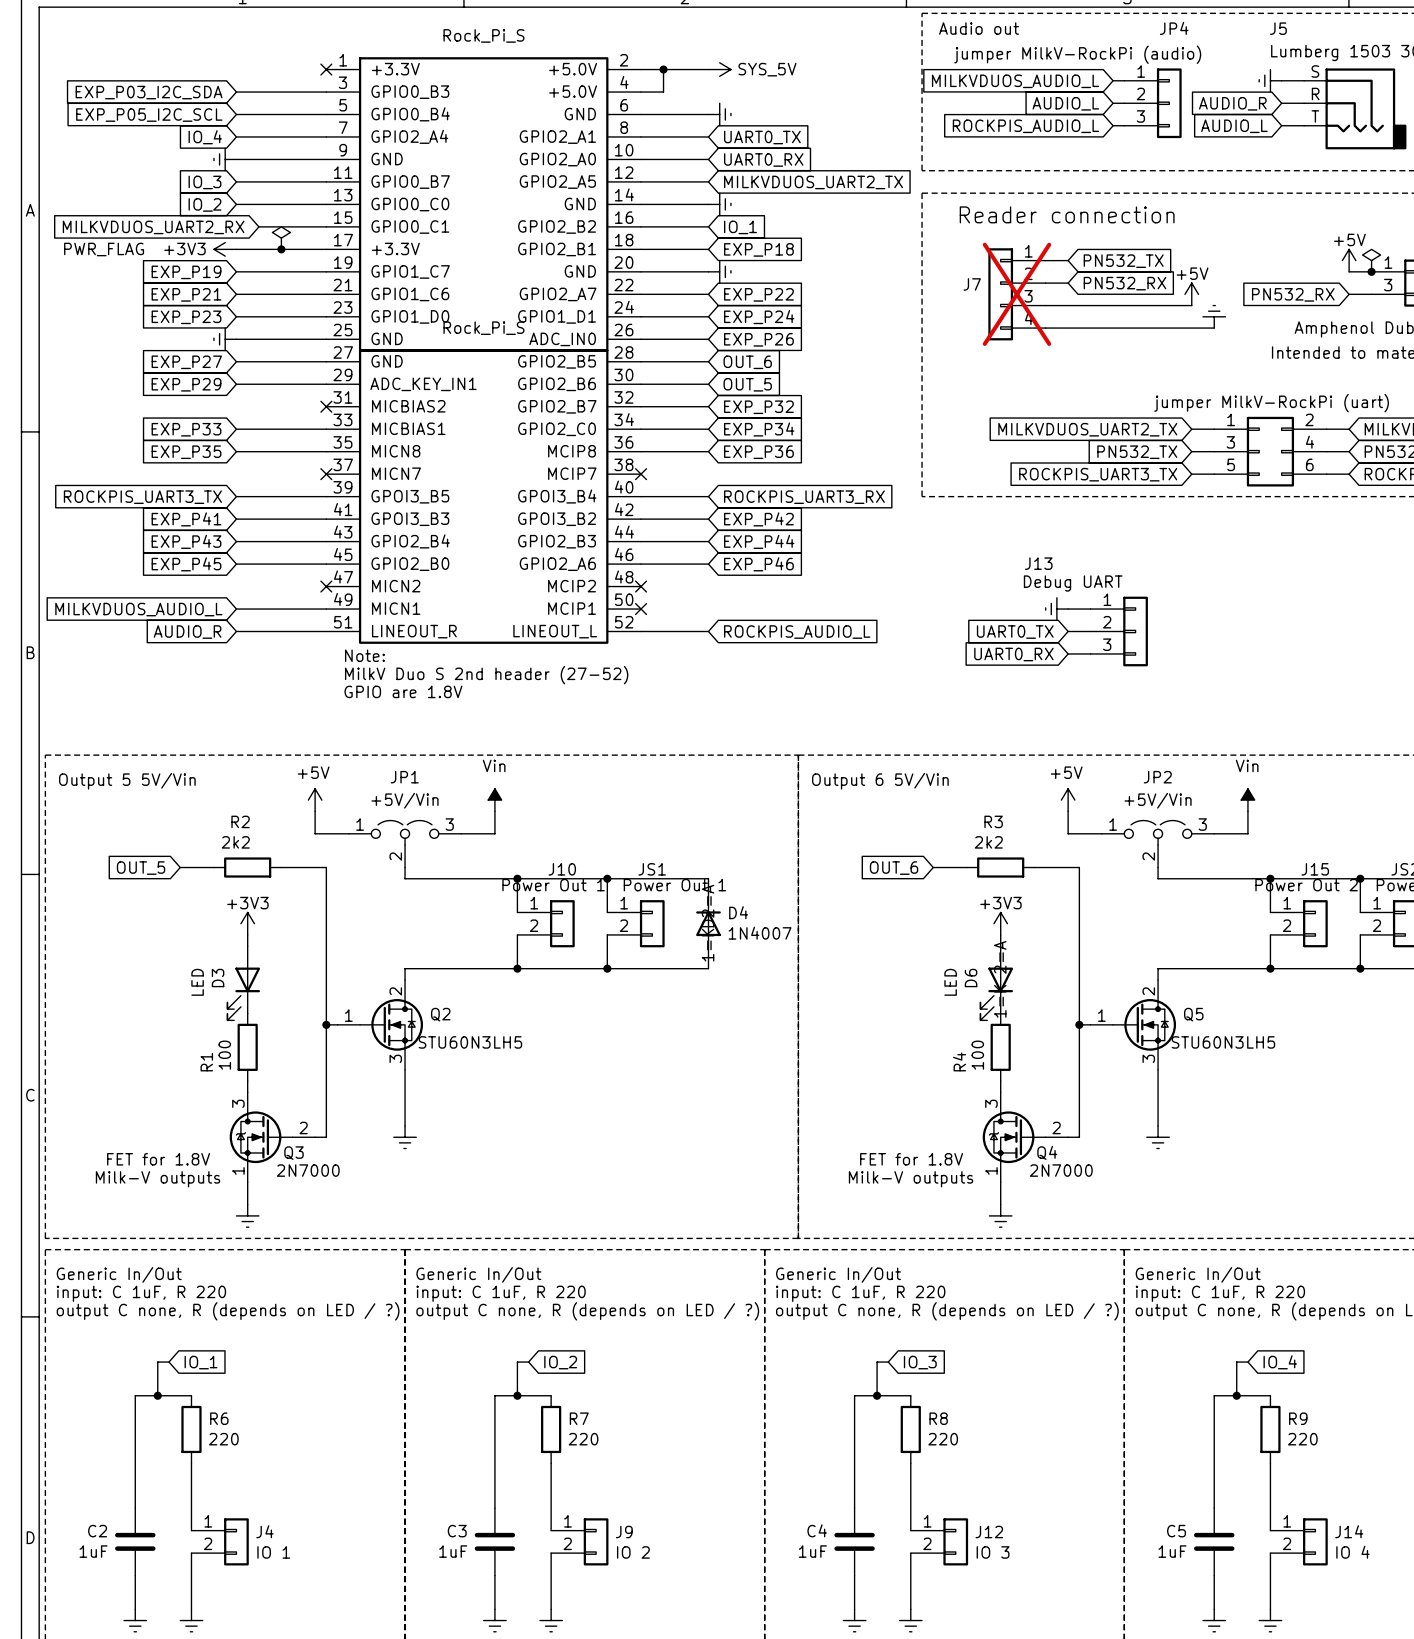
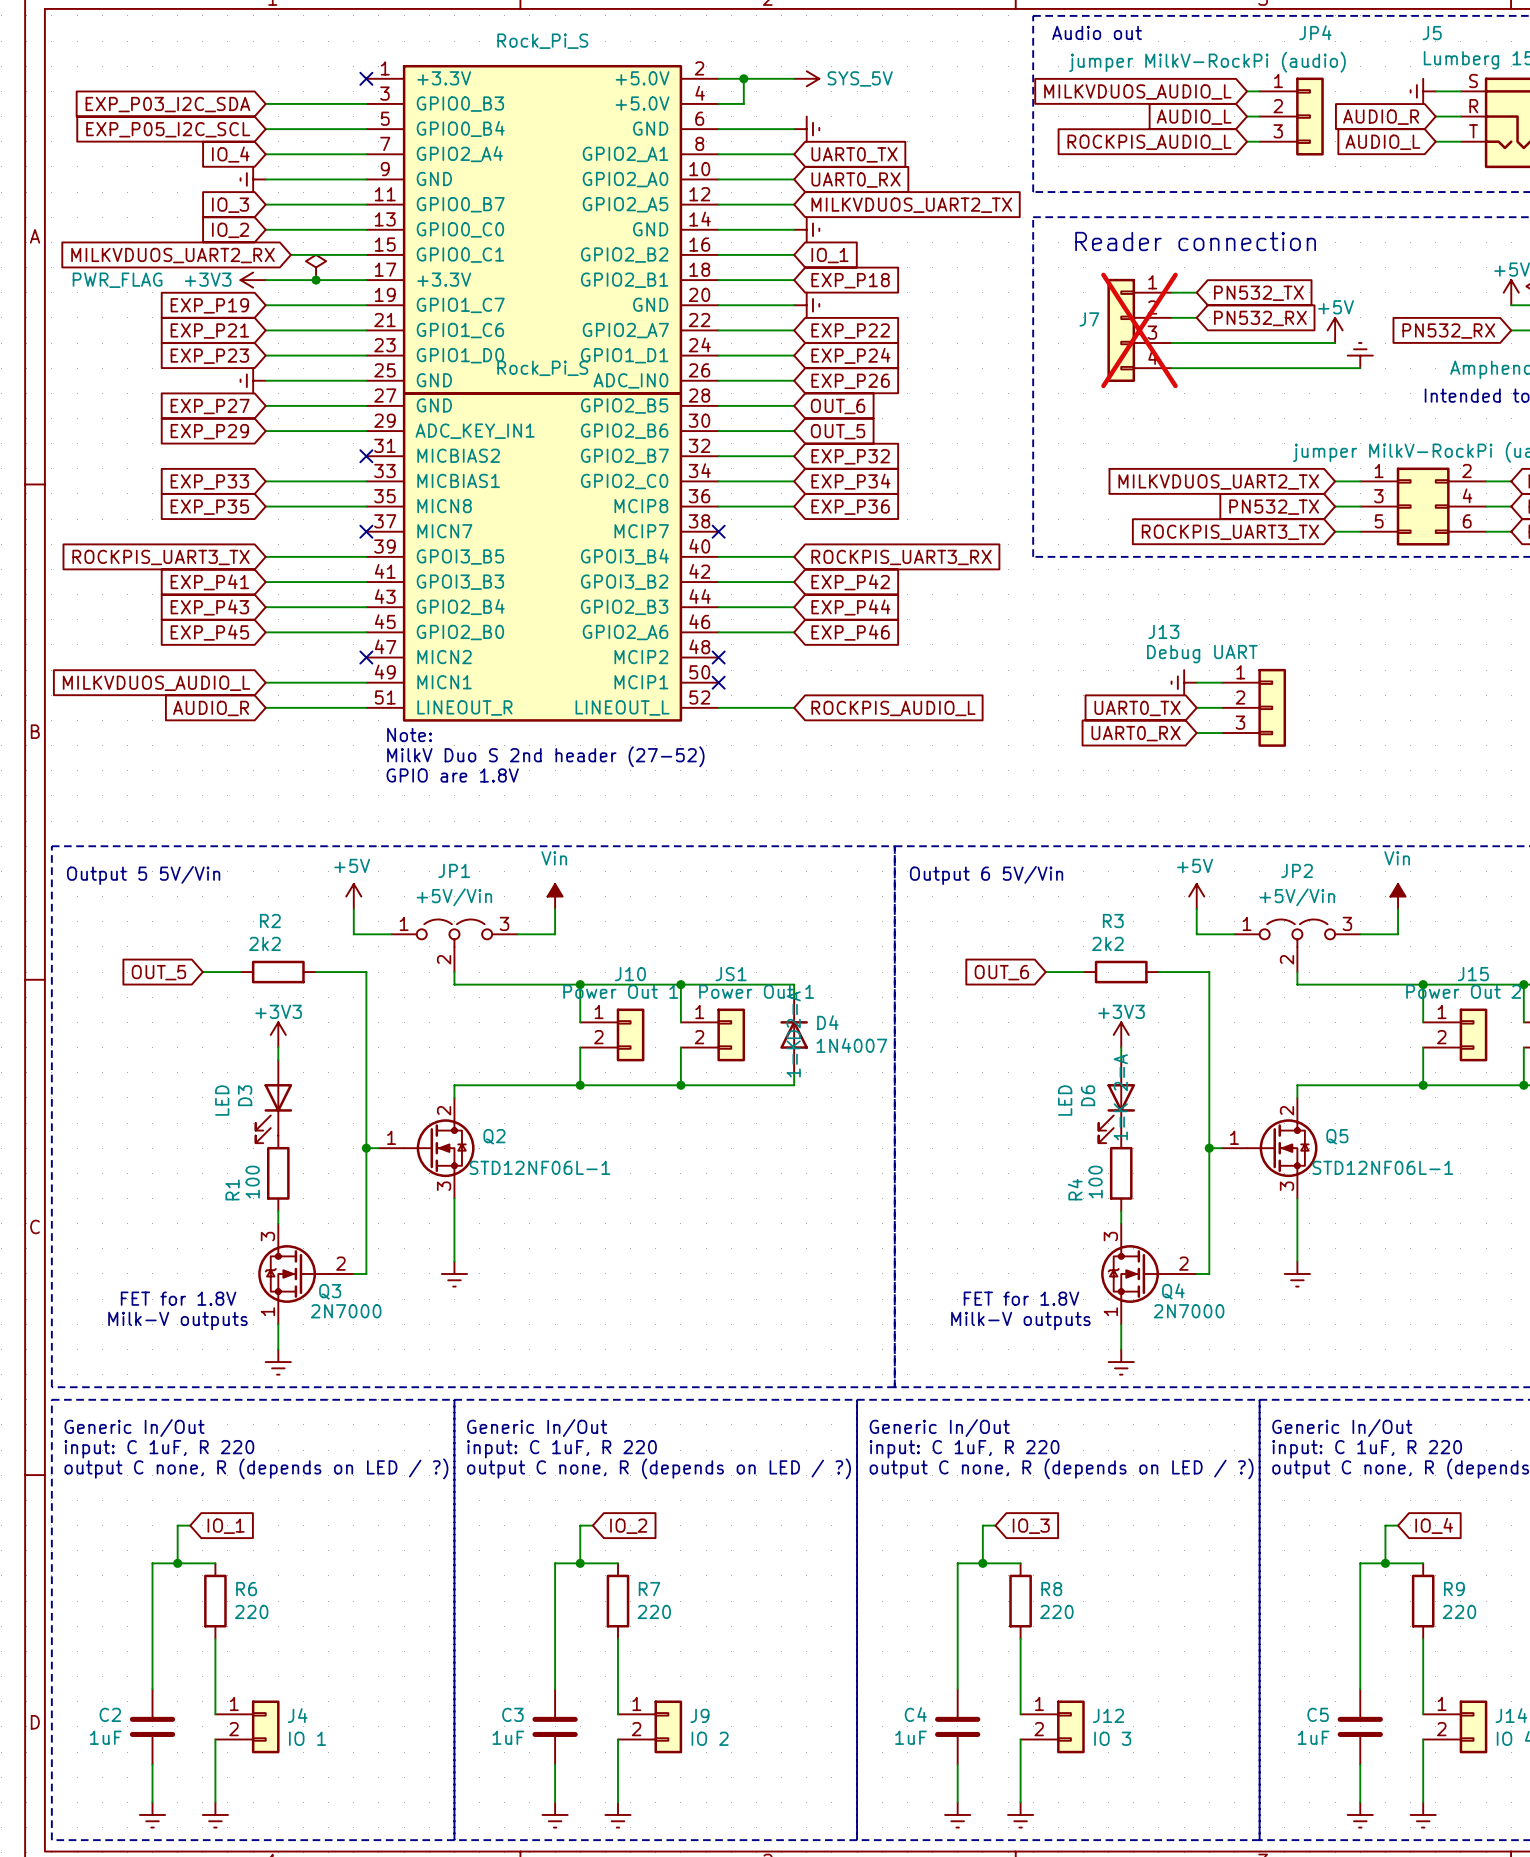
Q2 value: STU60N3LH5 (470, 1042) -> STD12NF06L-1 (539, 1167)
Q5 value: STU60N3LH5 (1223, 1042) -> STD12NF06L-1 (1382, 1167)

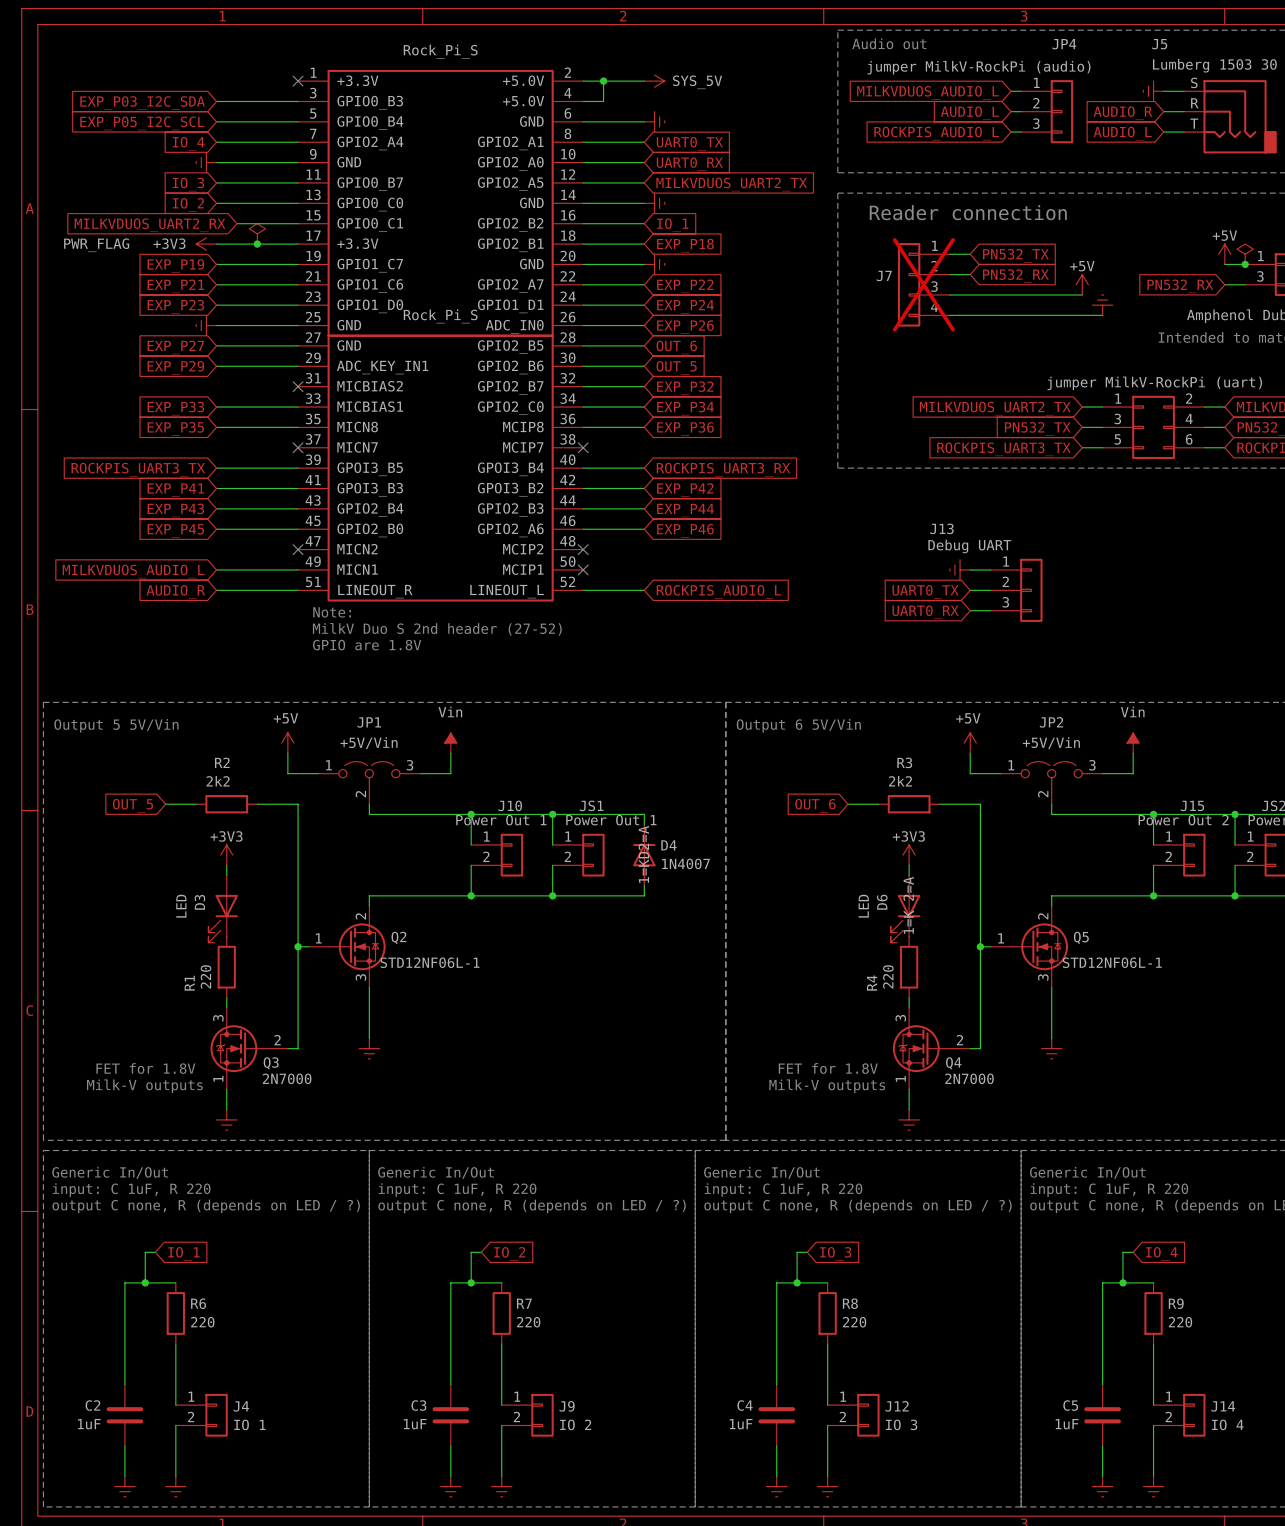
R1 value: 100 (252, 1182) -> 220 (206, 976)
R4 value: 100 (1095, 1182) -> 220 (888, 976)

